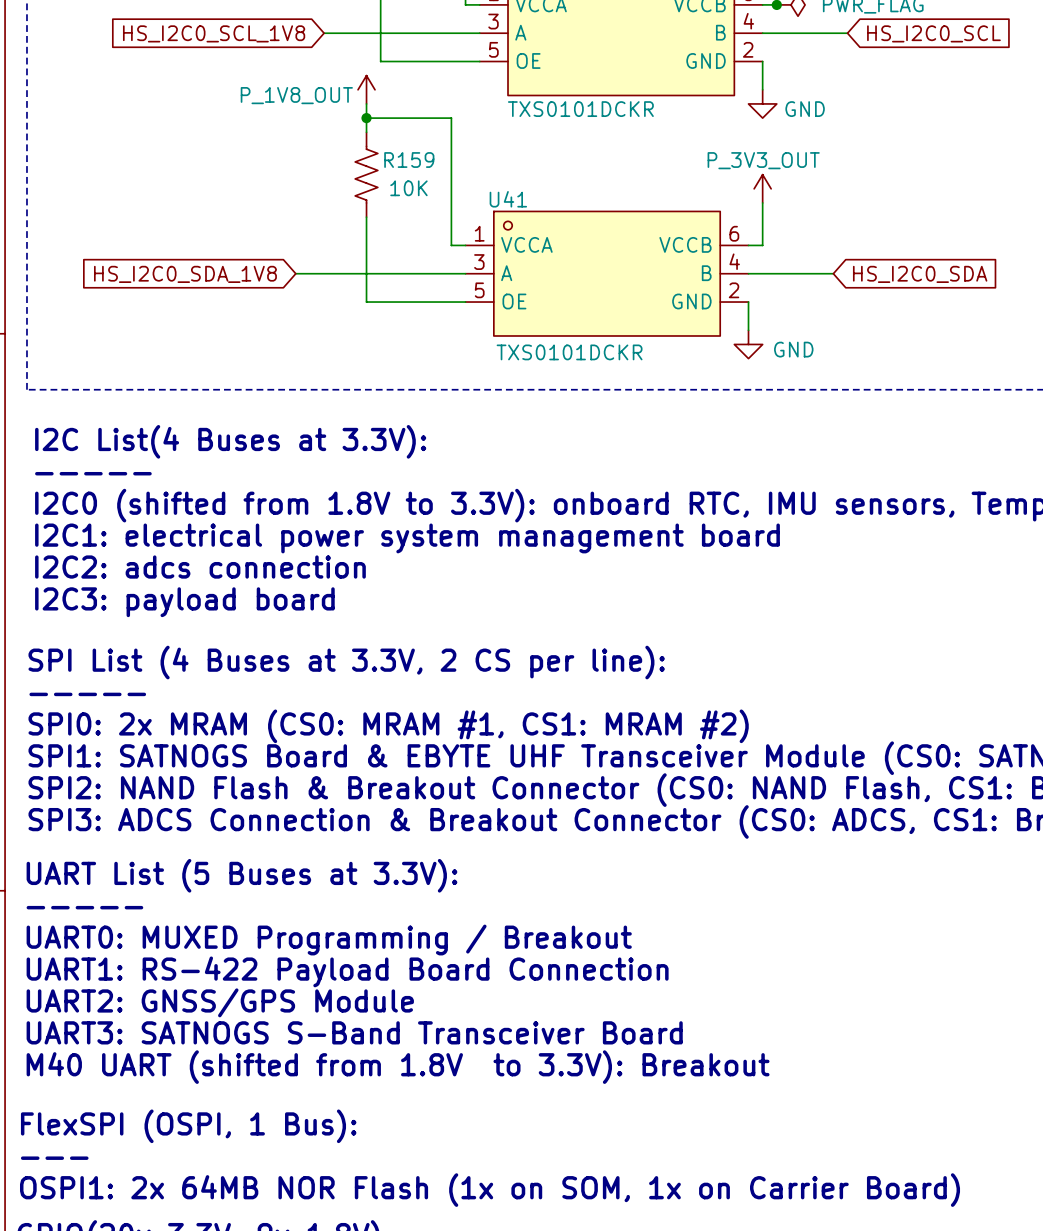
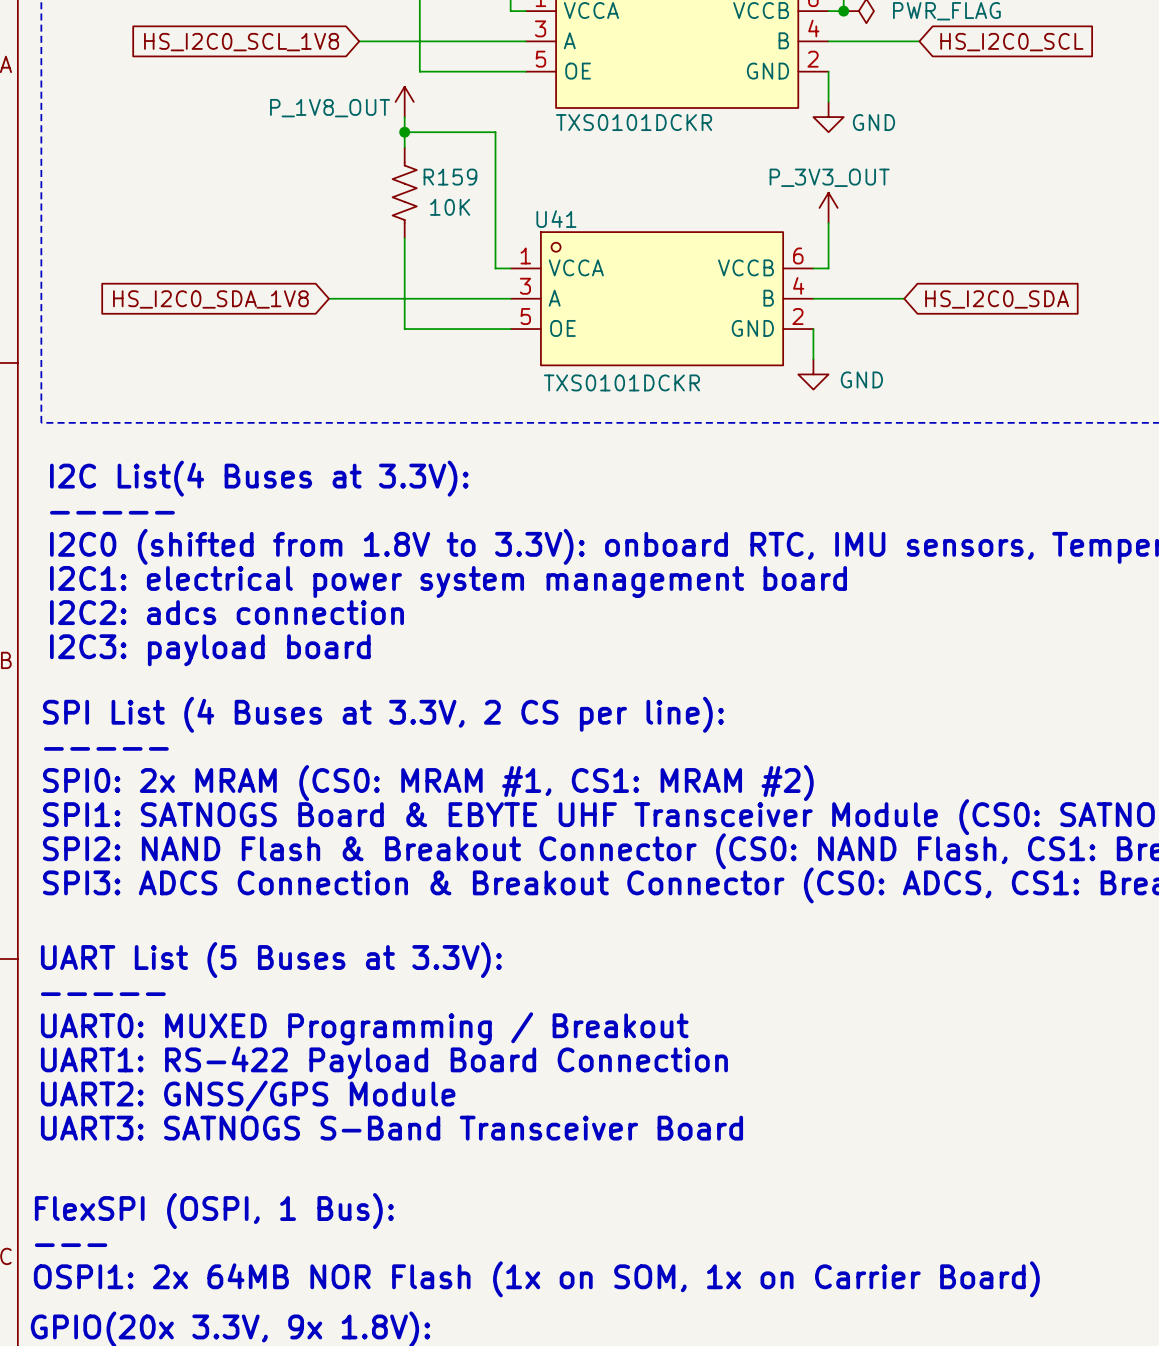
text position: UART List (5 Buses at 3.3V): (241, 875) -> UART List (5 Buses at 3.3V): (271, 960)
text position: ----- (84, 907) -> ----- (103, 994)
text position: UART0: MUXED Programming / Breakout (329, 940) -> UART0: MUXED Programming / Breakout (364, 1028)
text position: UART1: RS-422 Payload Board Connection (347, 971) -> UART1: RS-422 Payload Board Connection (384, 1062)
text position: UART2: GNSS/GPS Module (220, 1002) -> UART2: GNSS/GPS Module (248, 1096)
text position: UART3: SATNOGS S-Band Transceiver Board (354, 1032) -> UART3: SATNOGS S-Band Transceiver Board (391, 1128)
text: M40 UART (shifted from 1.8V to 3.3V): Breakout (398, 1067) -> none

